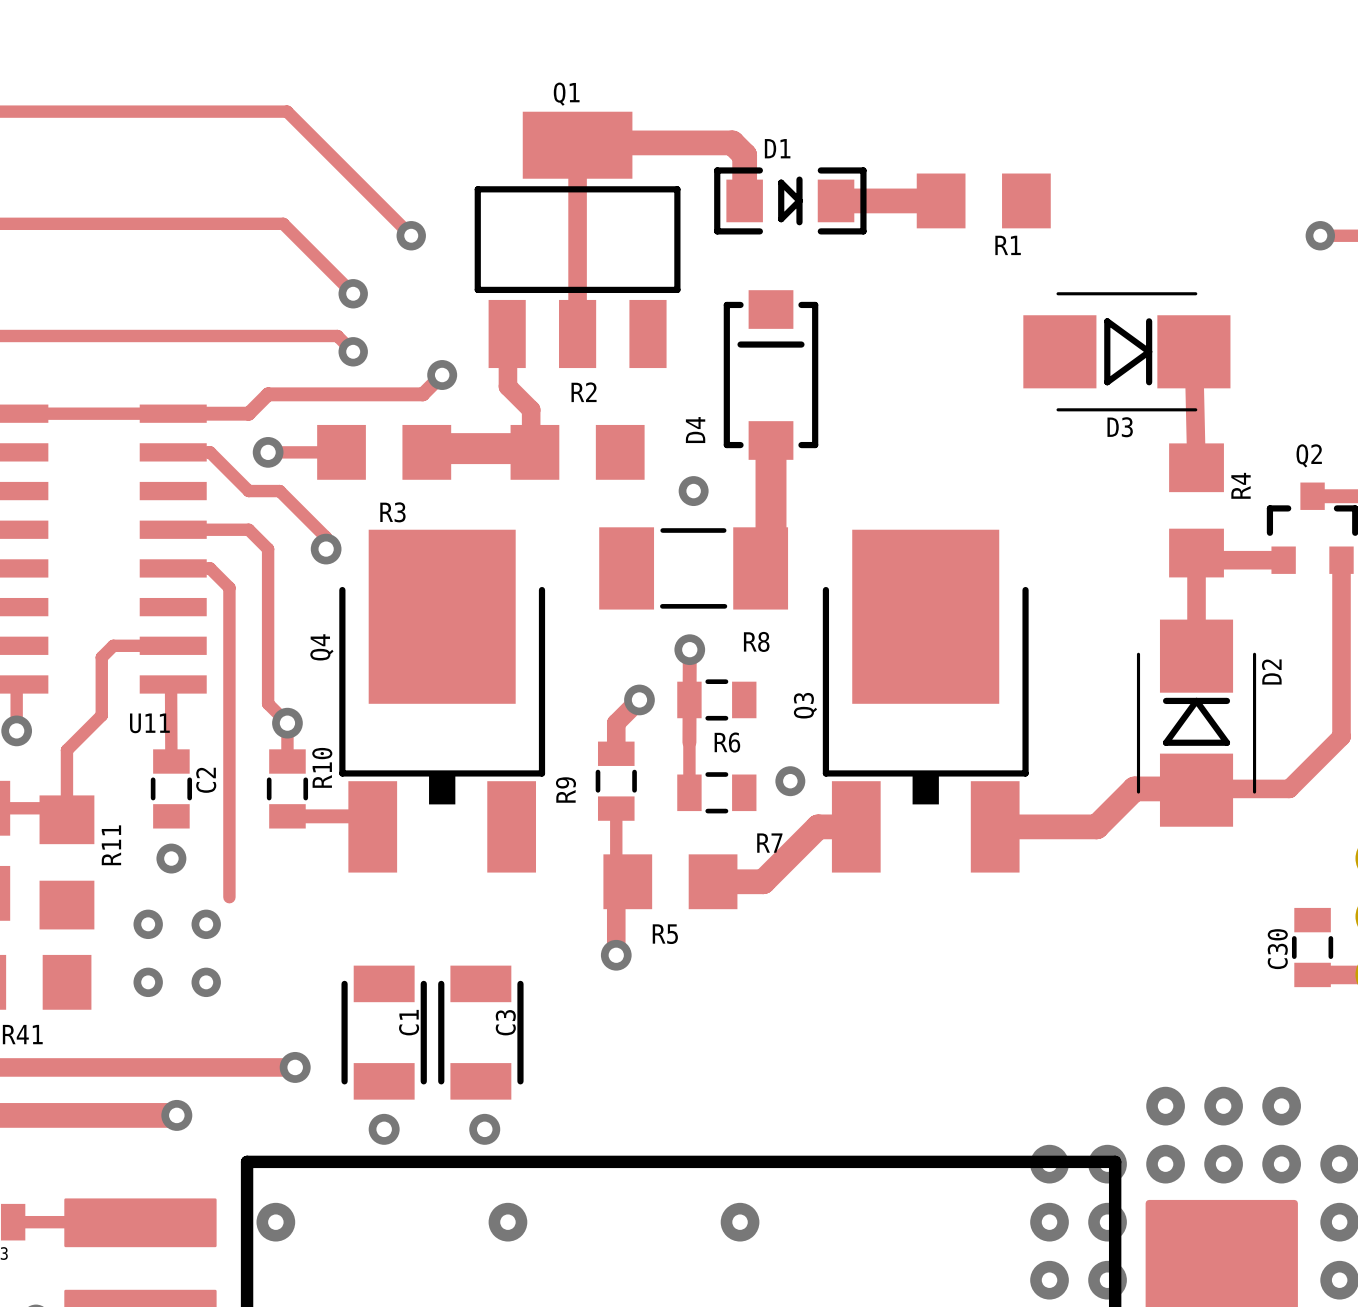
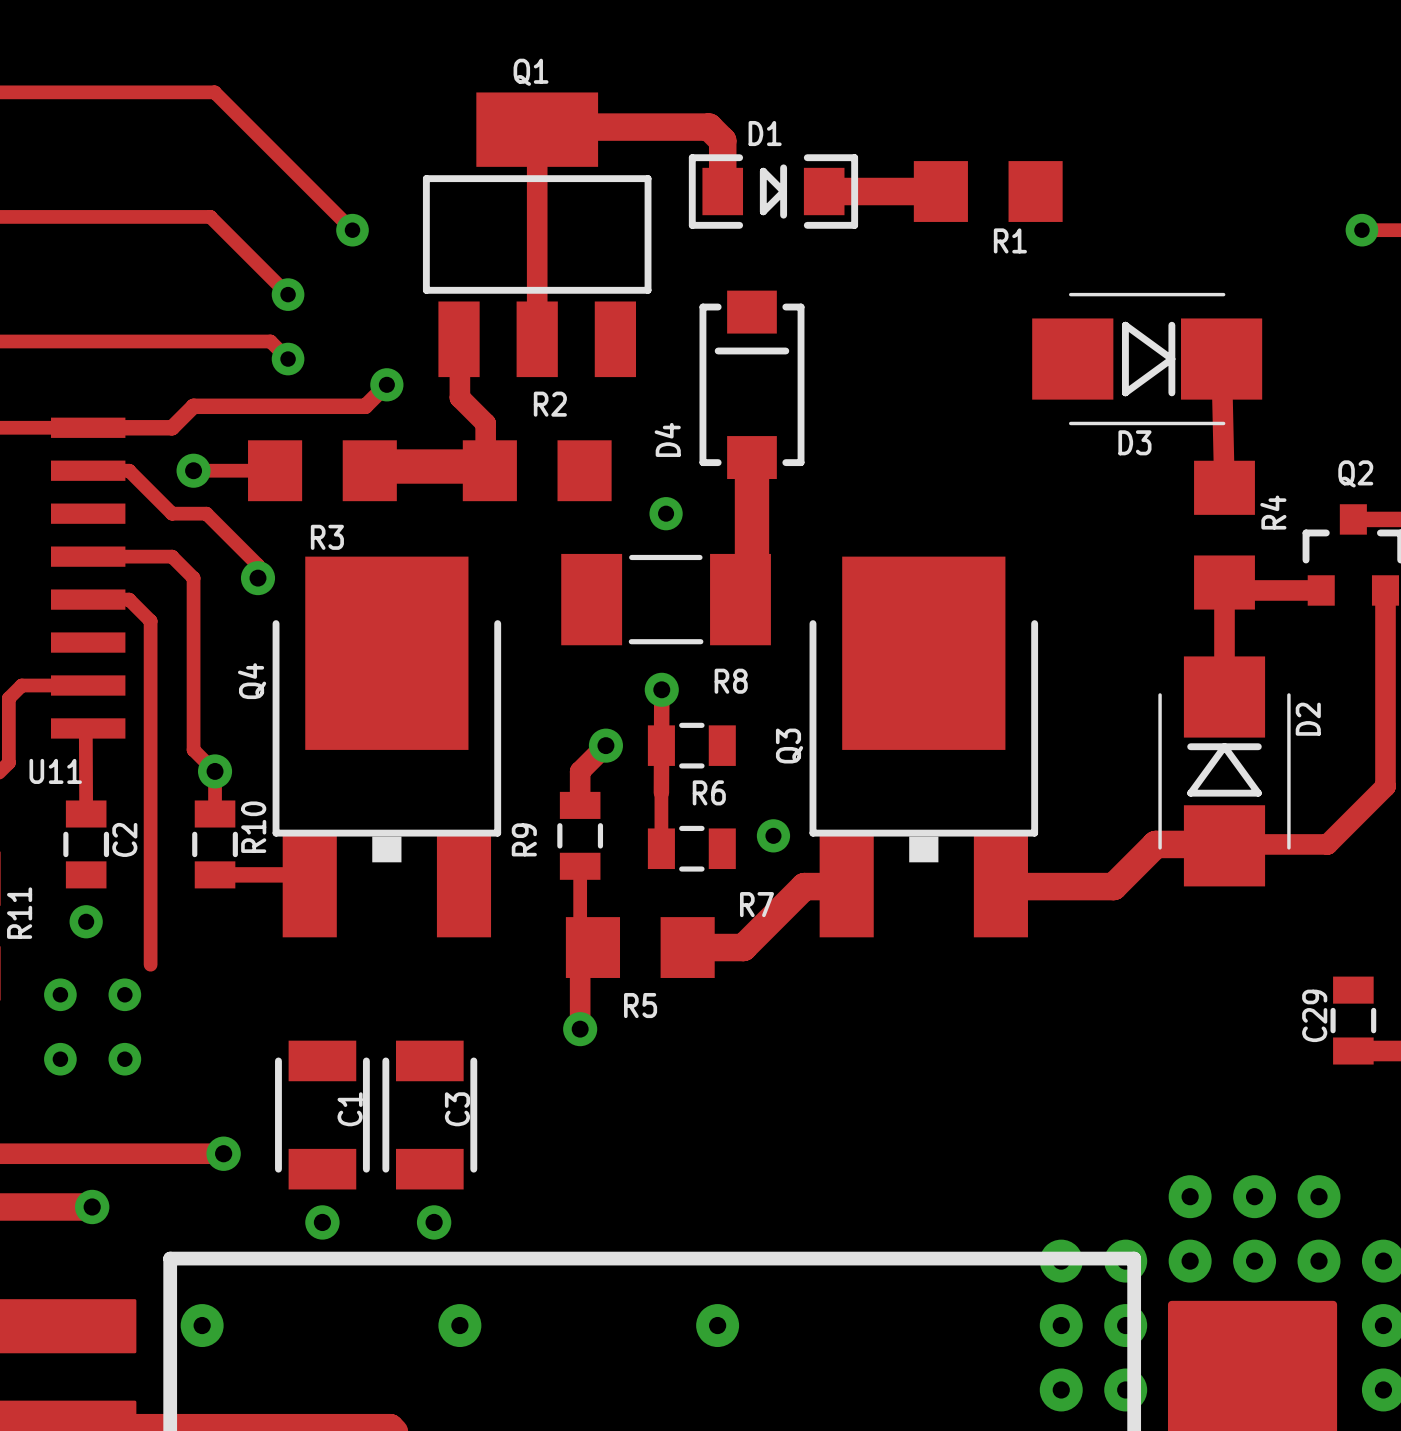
Q4 footprint: [339, 529, 546, 873] -> [272, 556, 502, 938]
Q3 footprint: [822, 529, 1029, 873] -> [809, 556, 1039, 938]
C30 name: C30 (1277, 949) -> C29 (1314, 1015)

